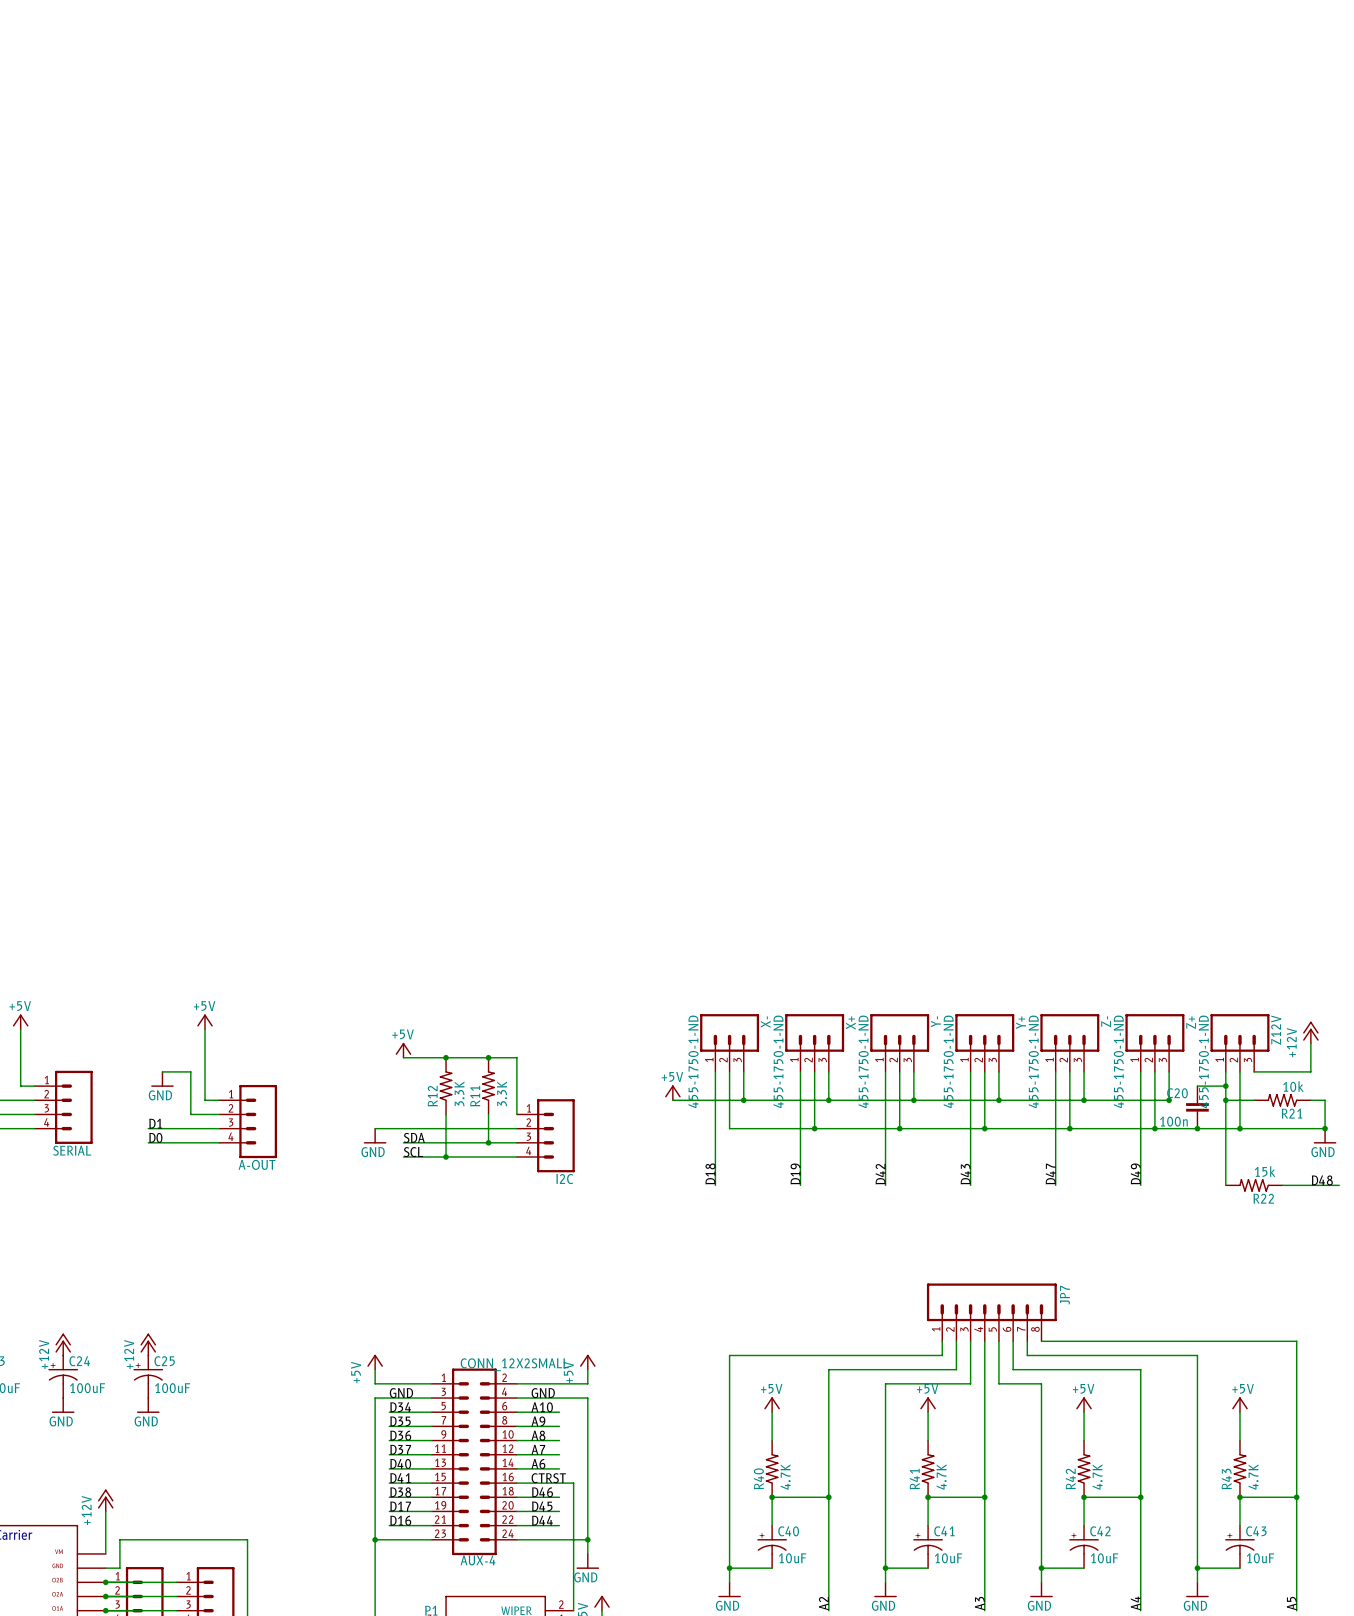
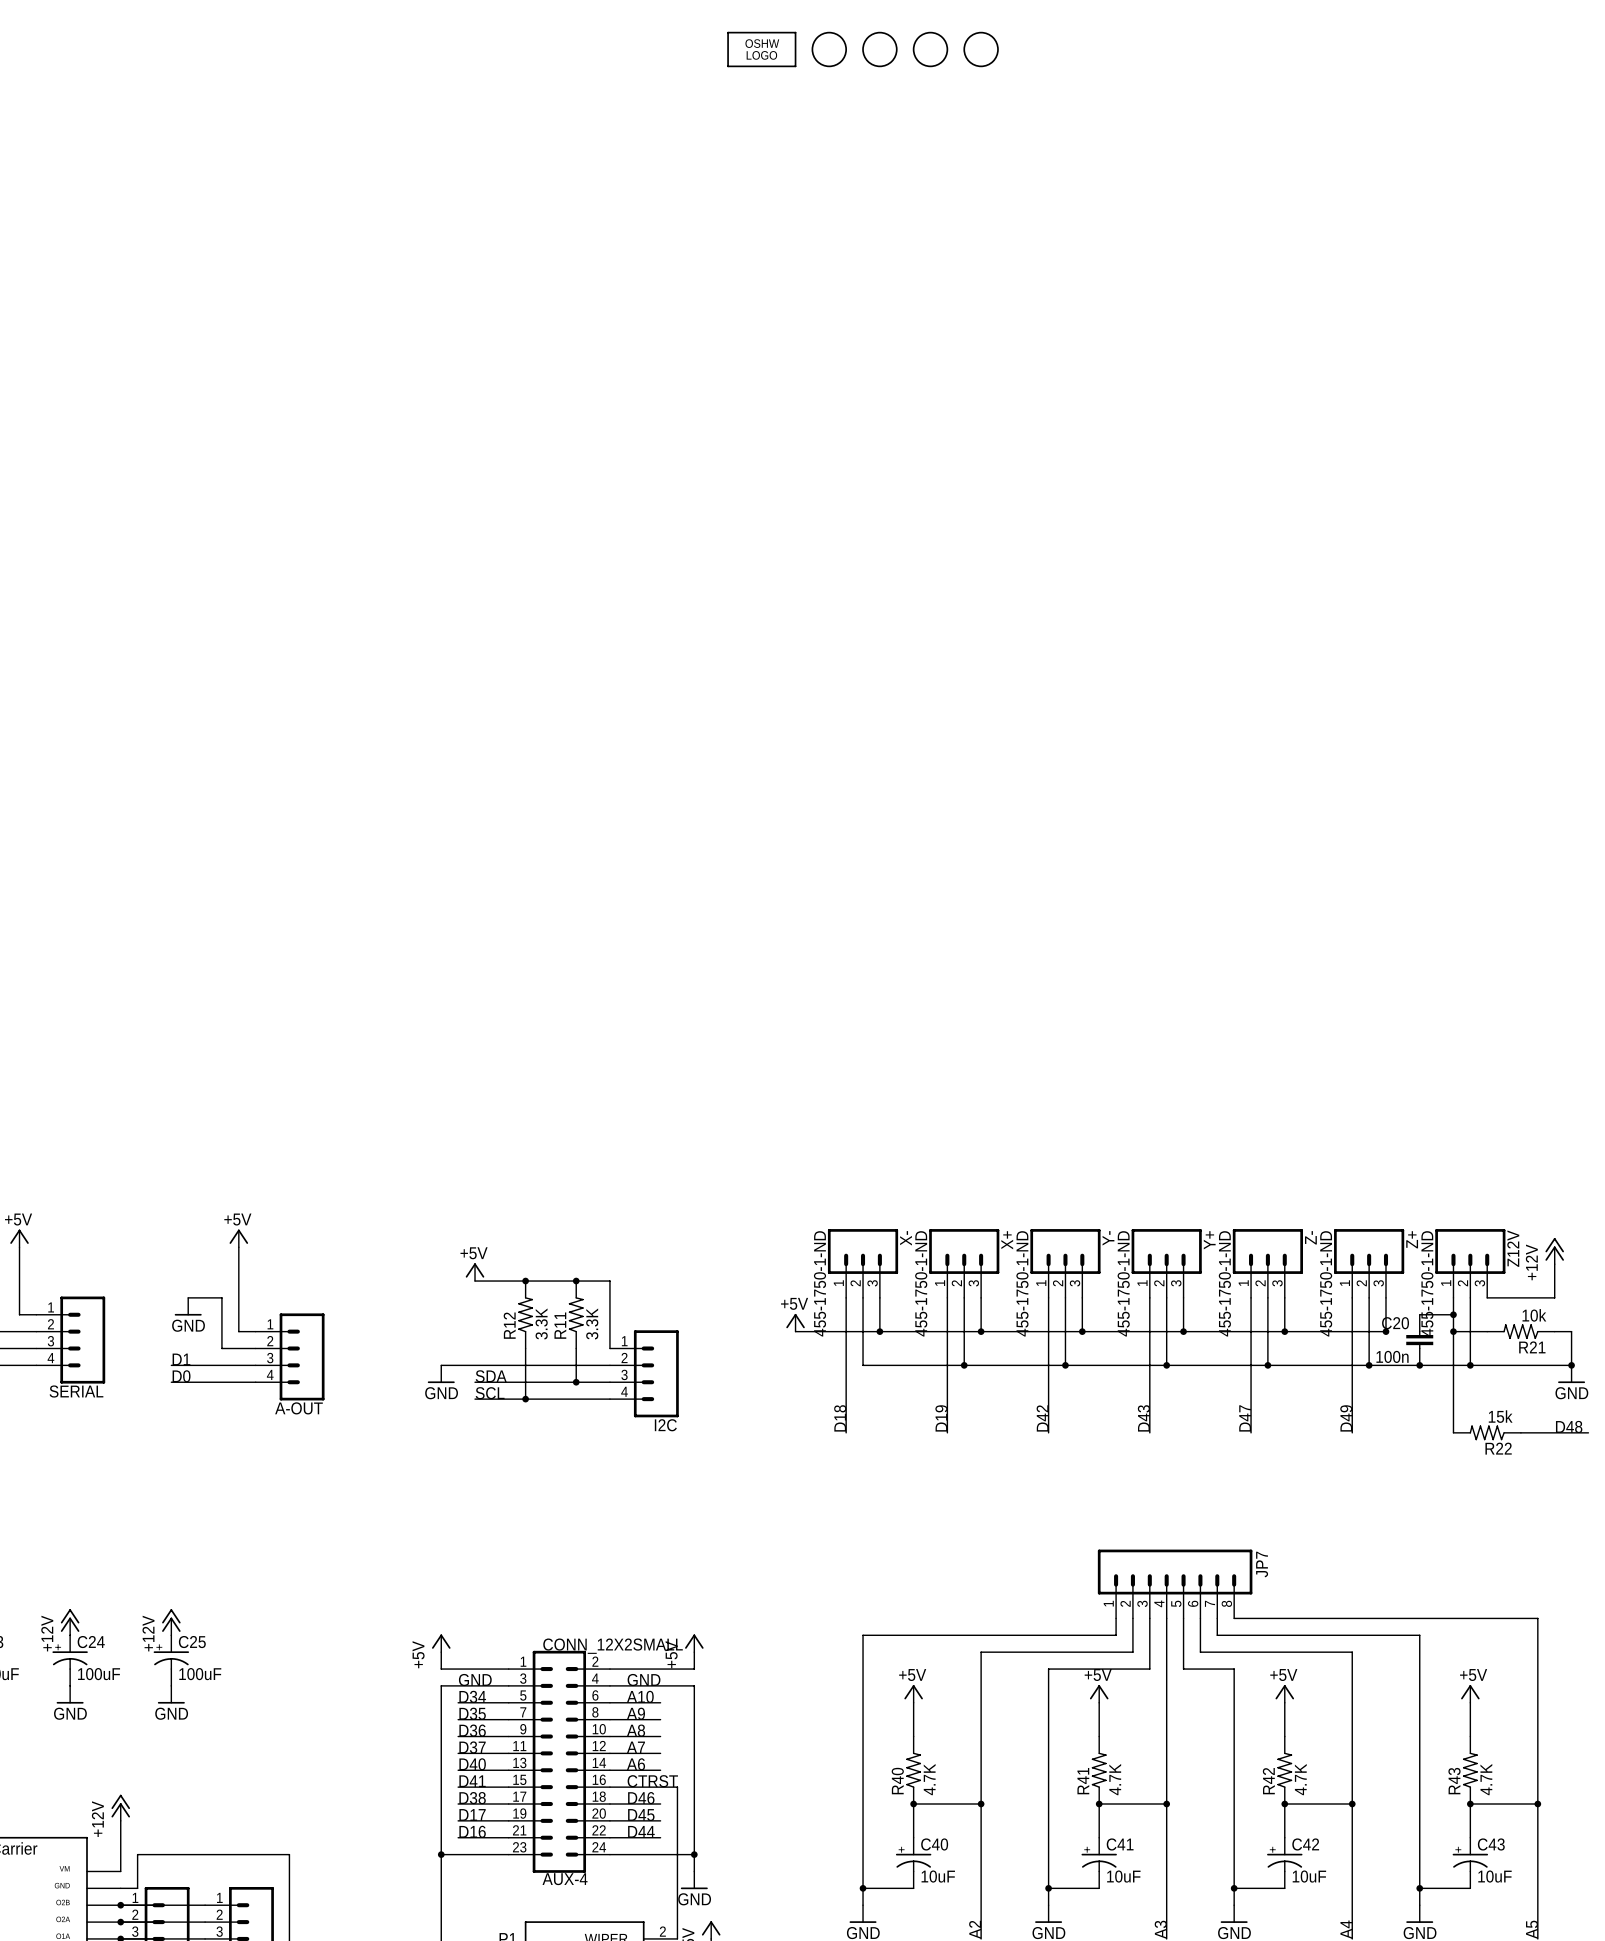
part: none -> (761, 49)
part: none -> (829, 49)
part: none -> (879, 49)
part: none -> (930, 49)
part: none -> (981, 49)

